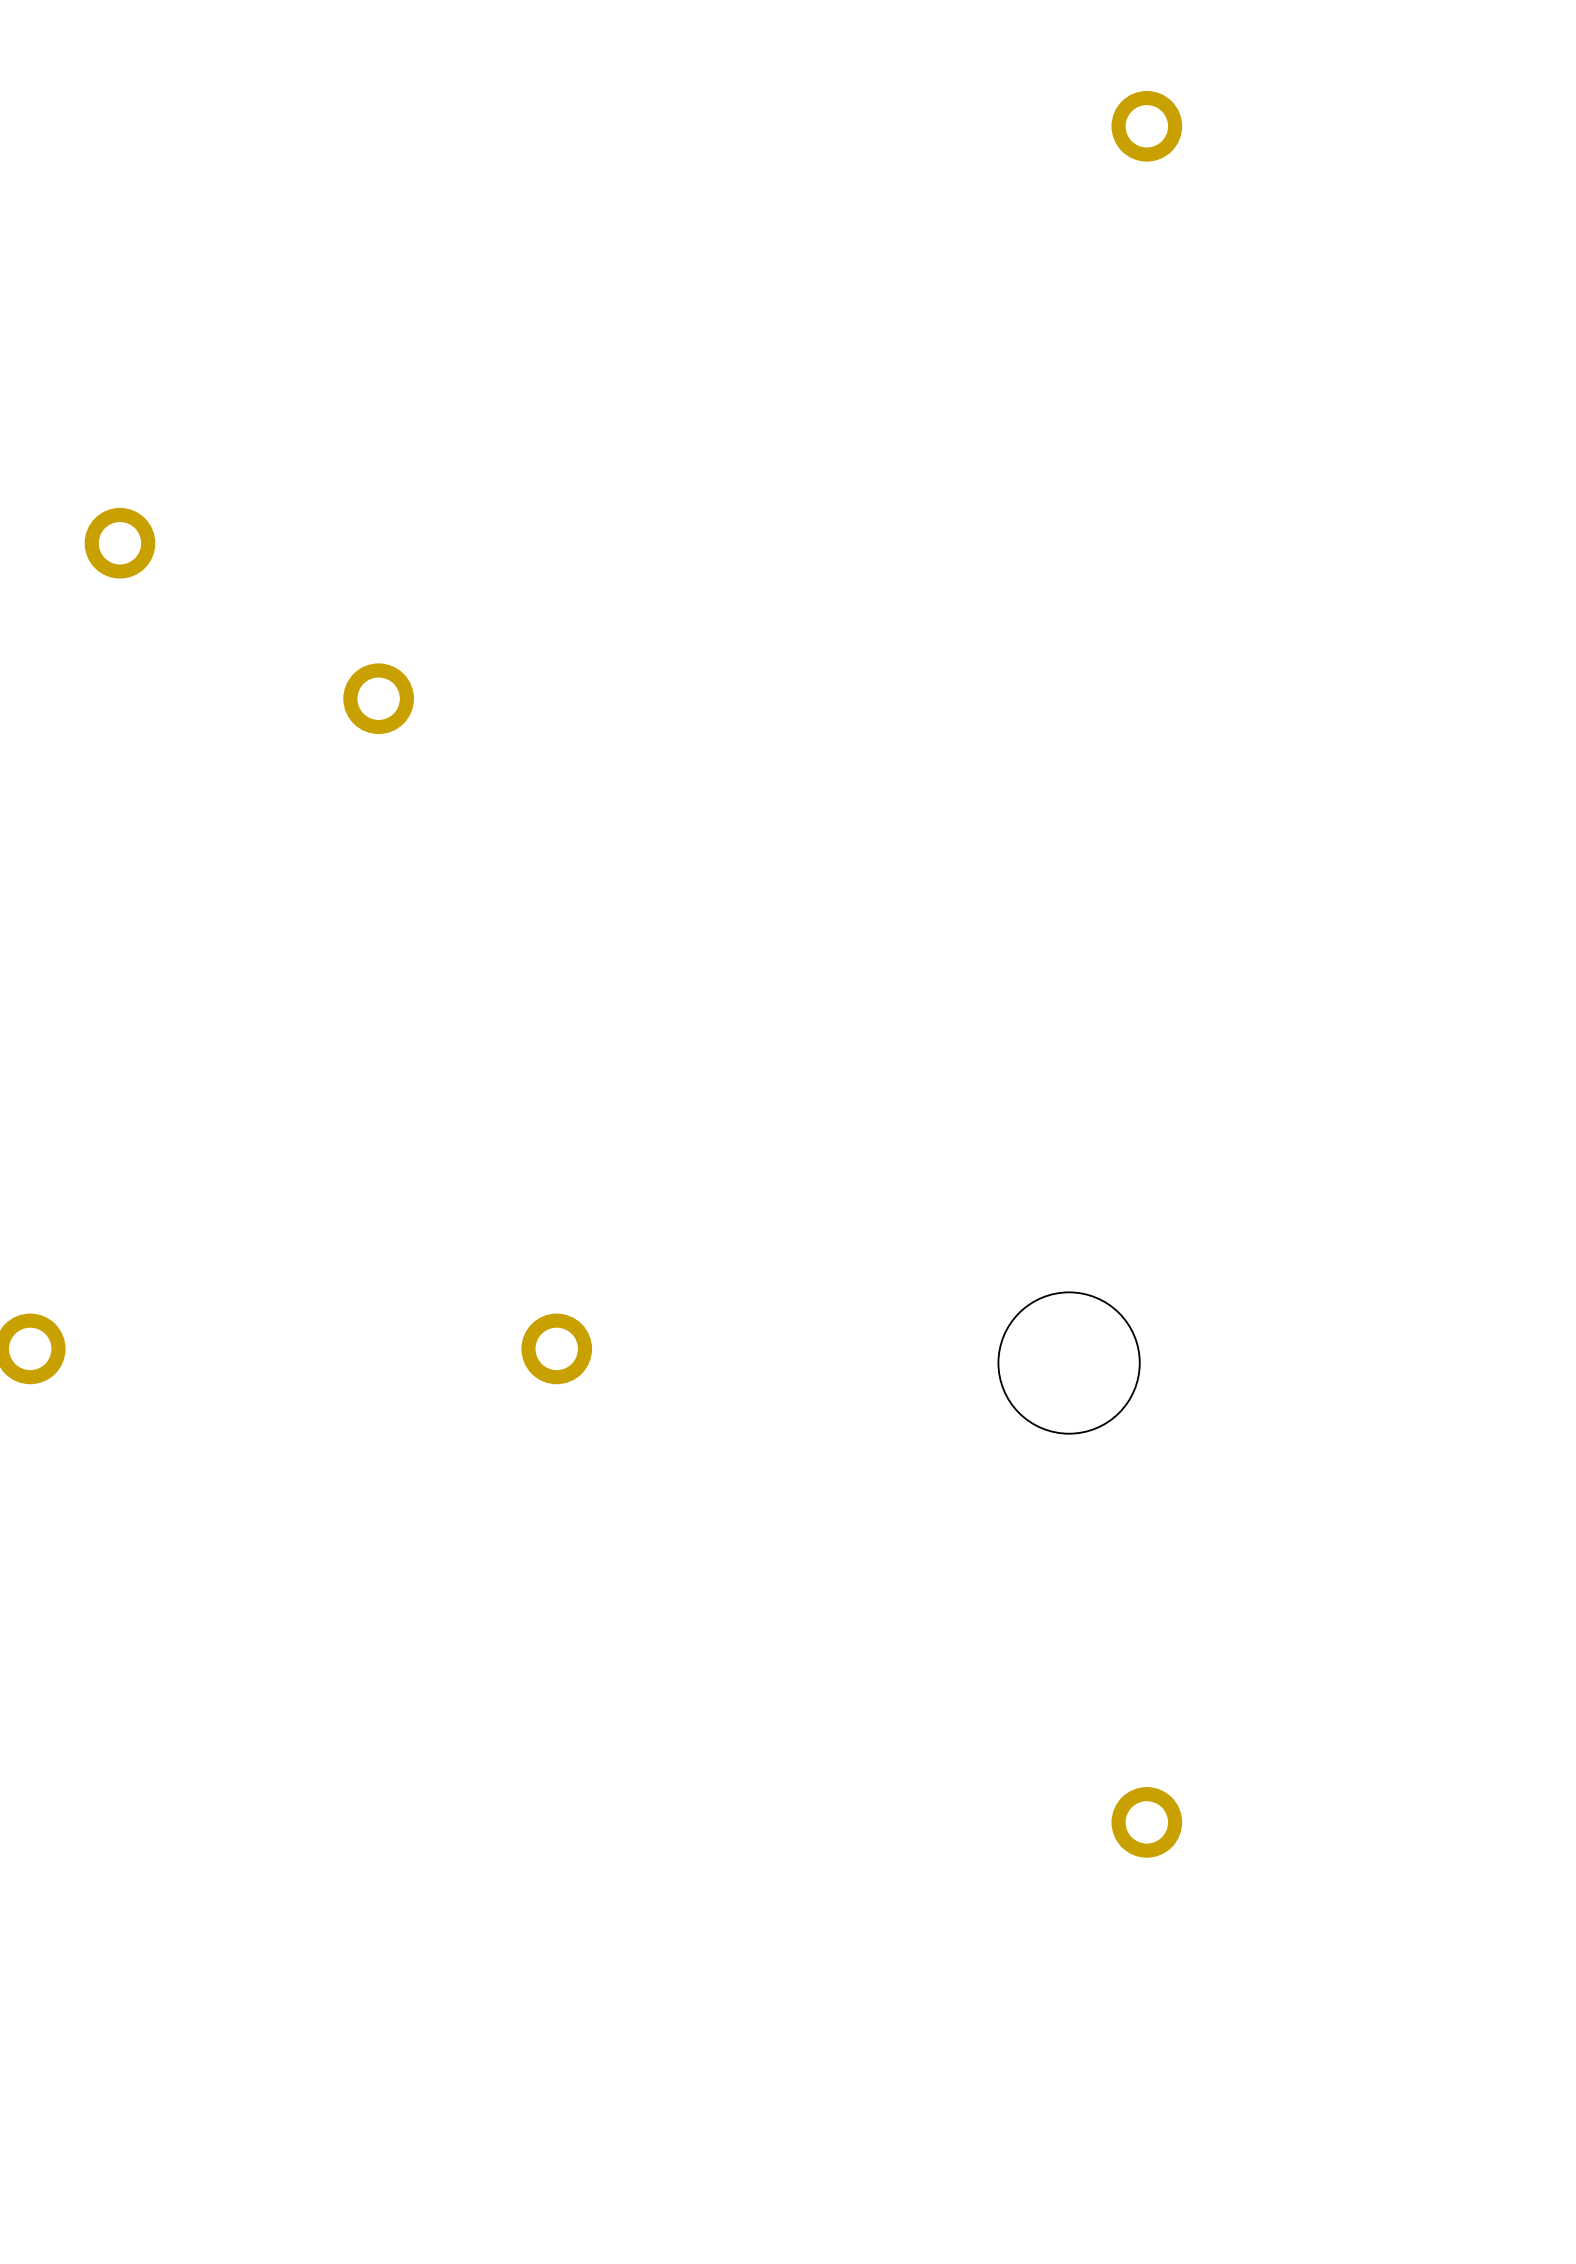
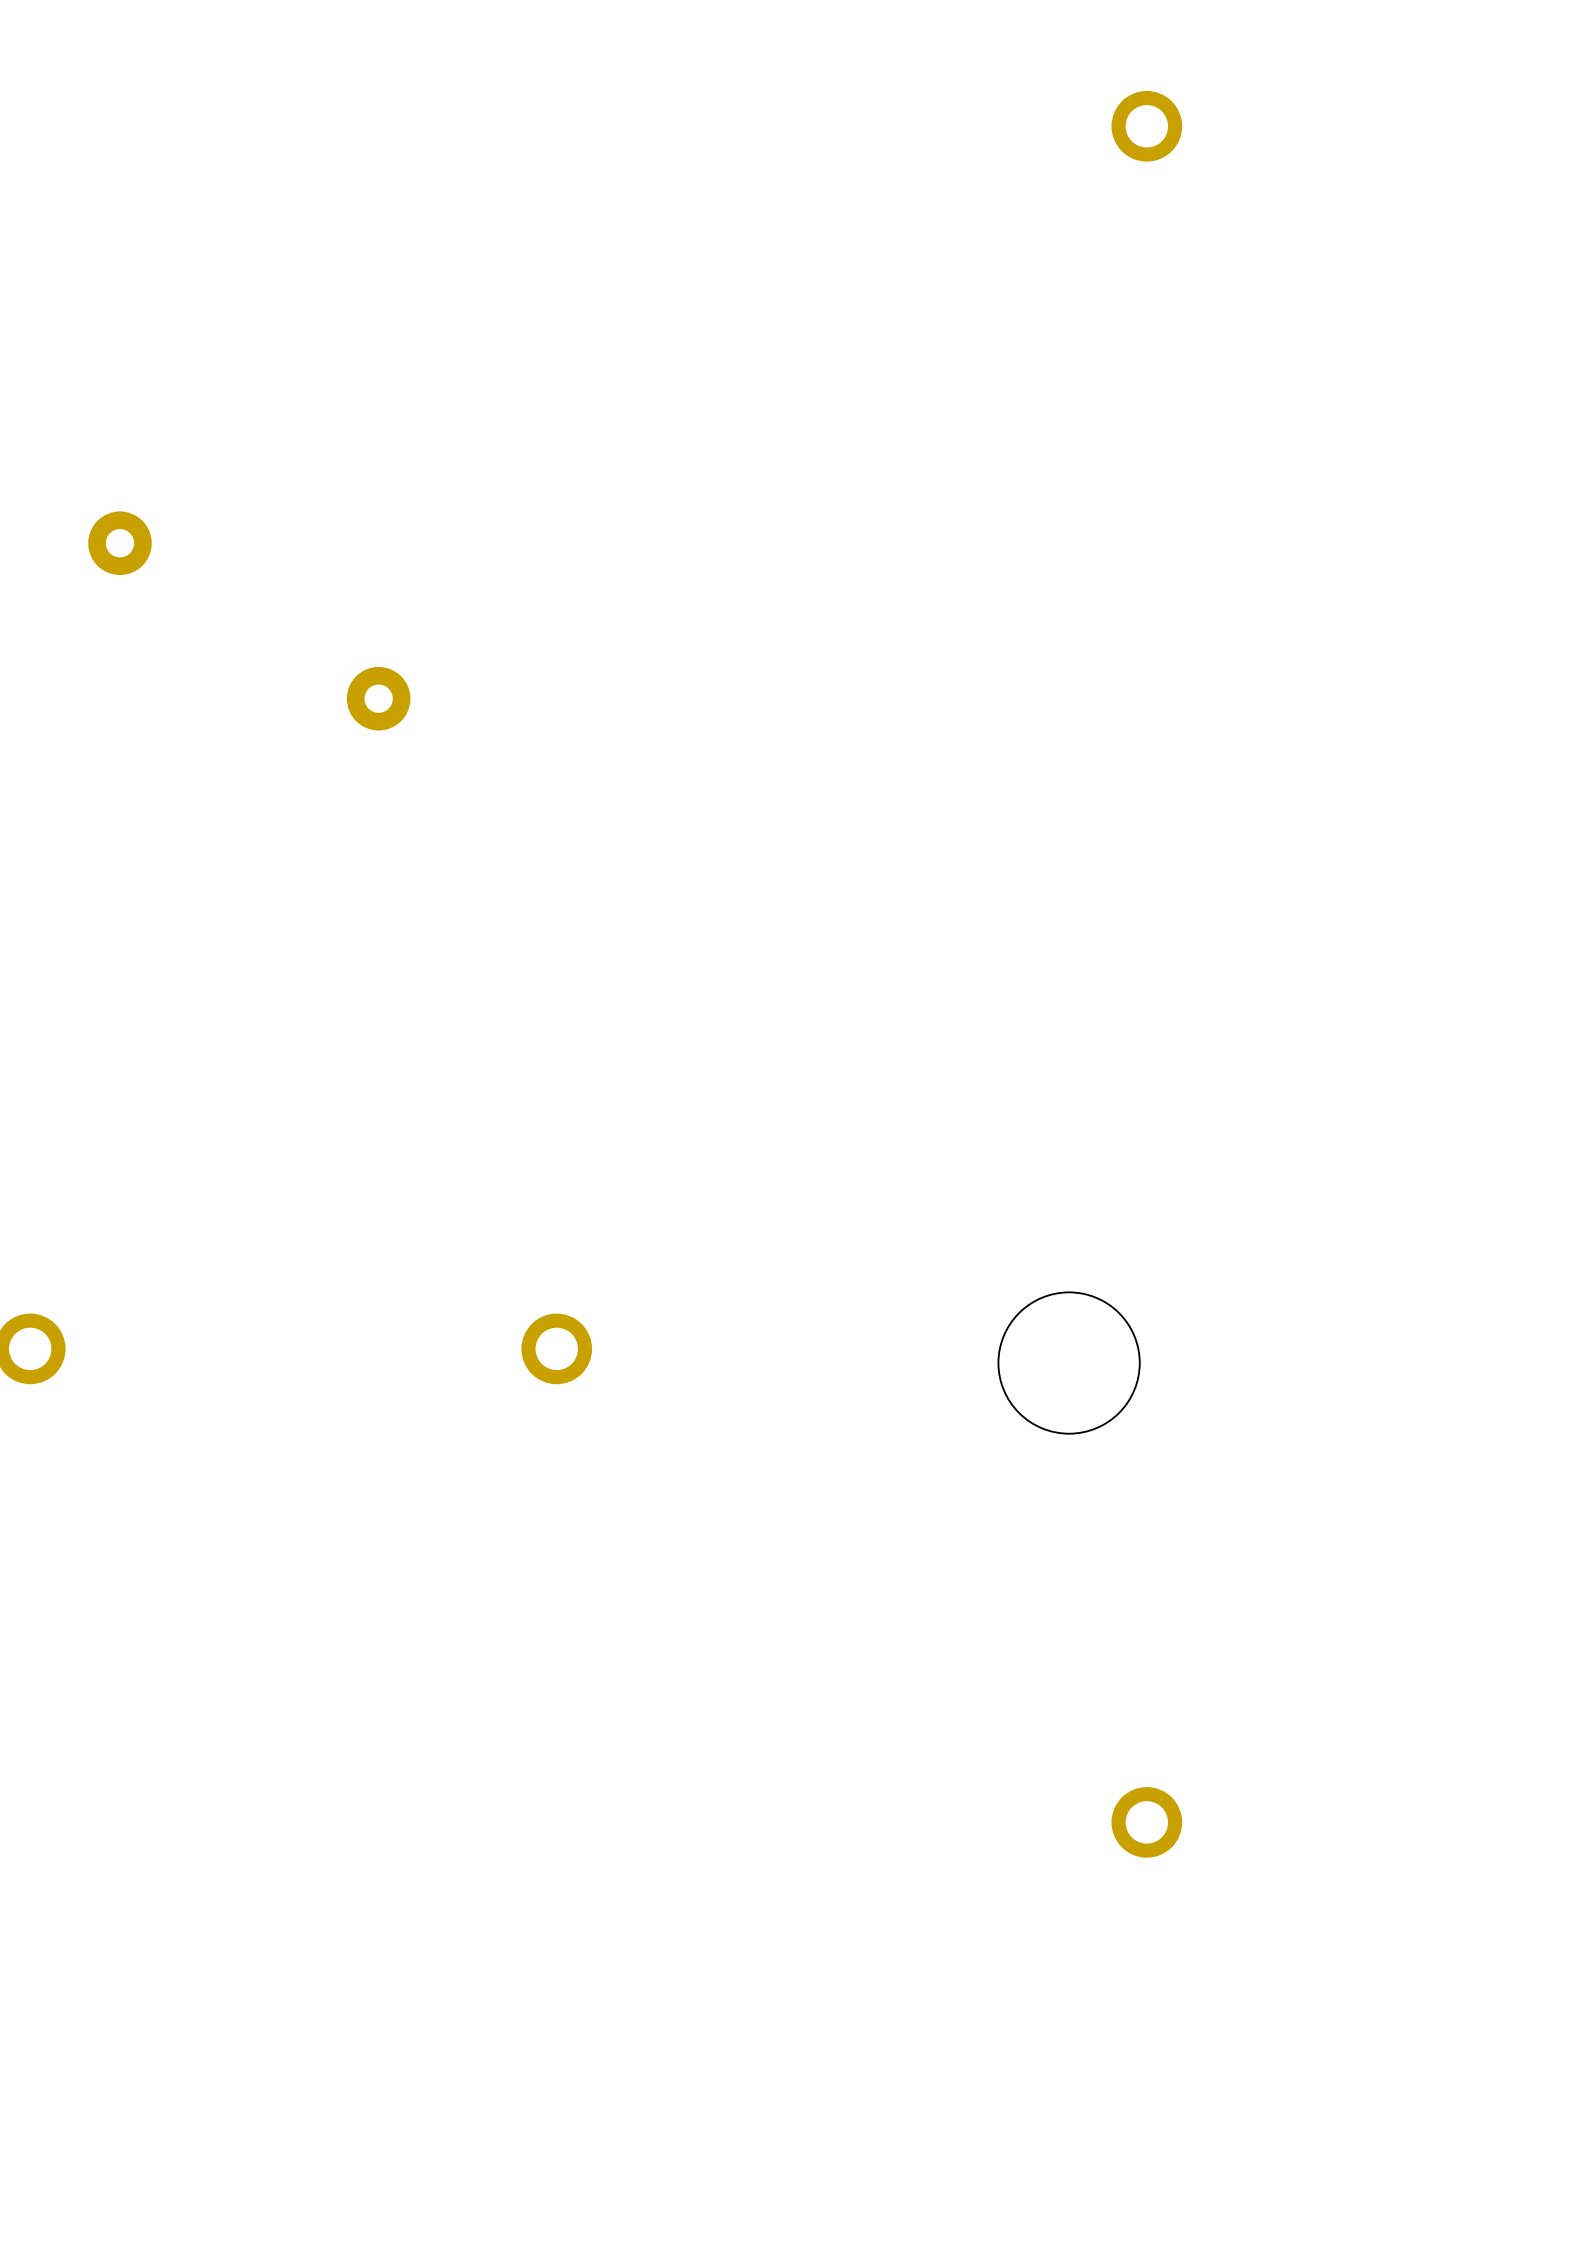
part footprint: [84, 507, 414, 735] -> [88, 511, 411, 731]

